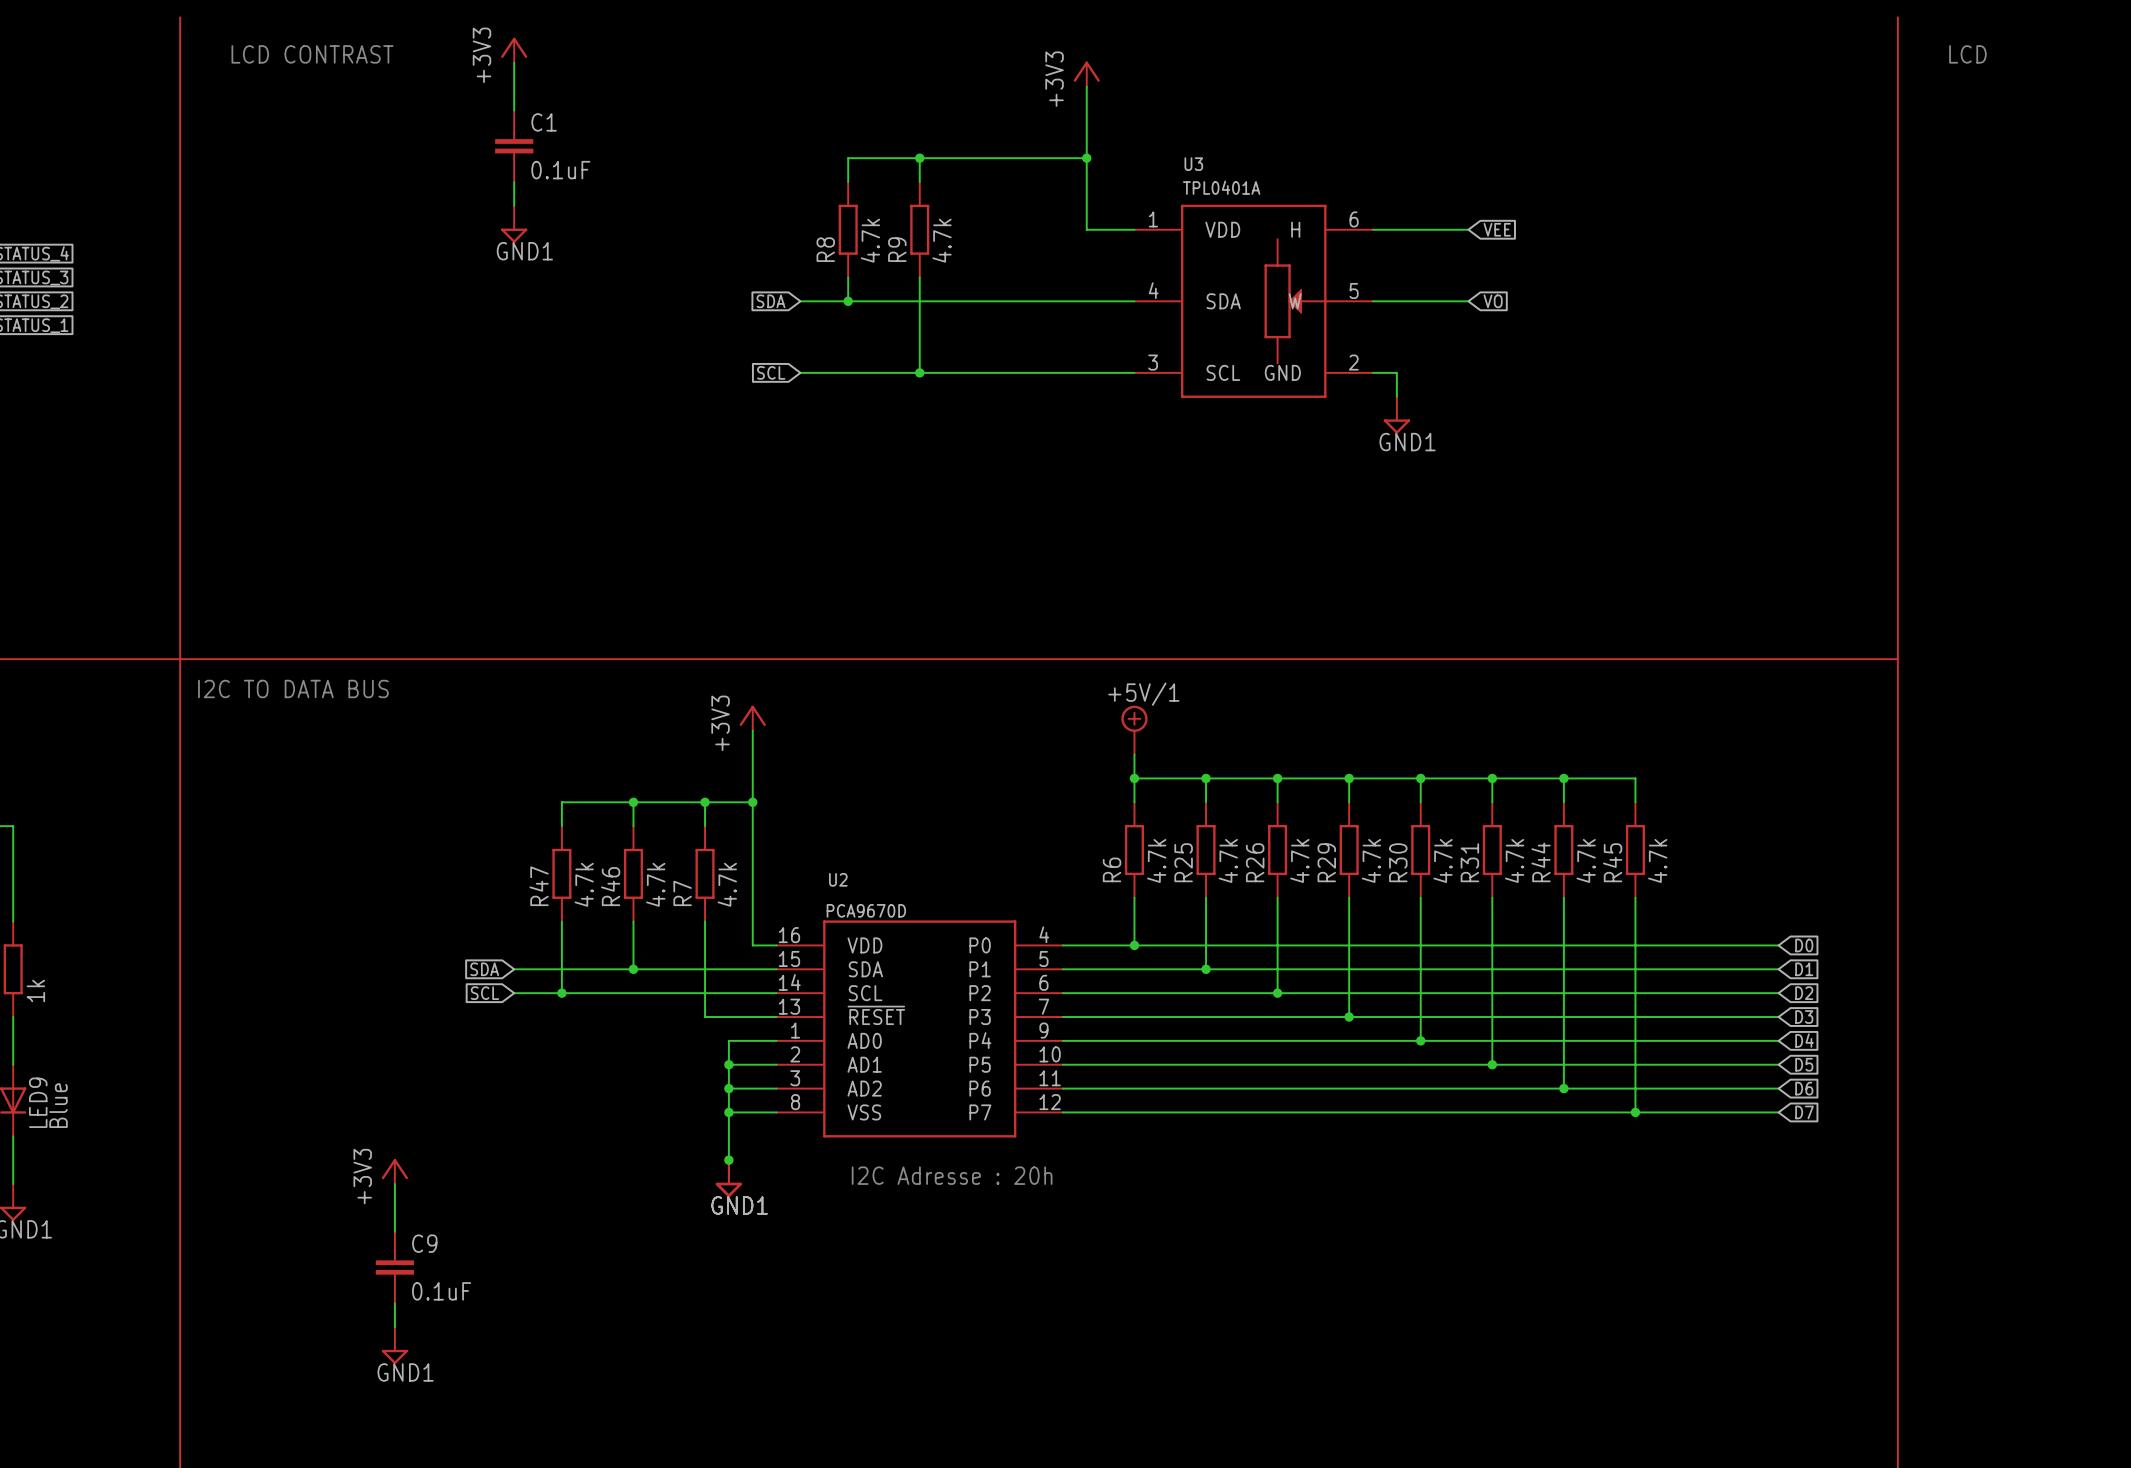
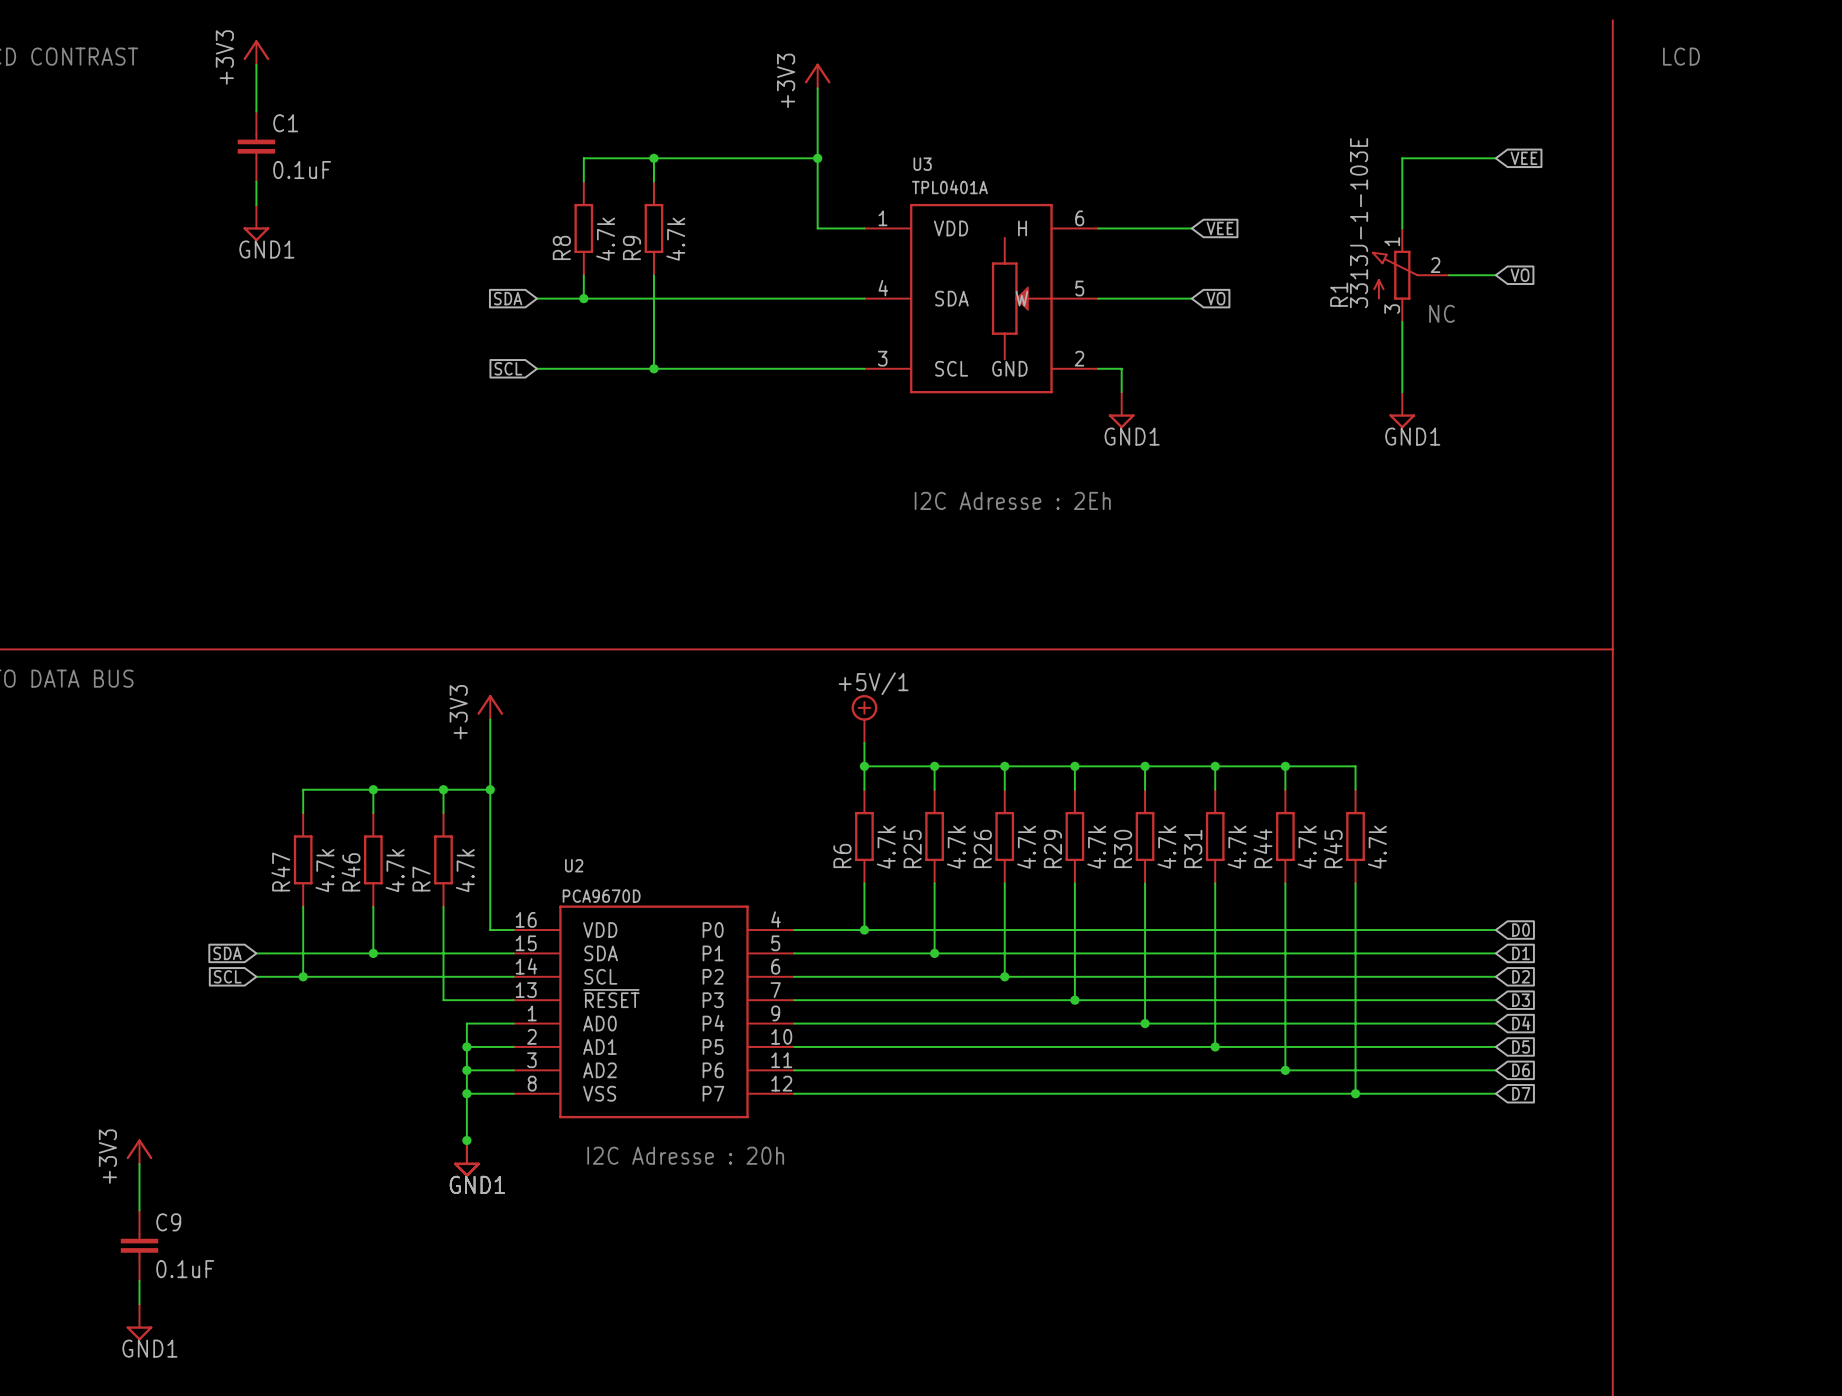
wire: none -> (1495, 158) (1402, 158) (1402, 228)
global label: none -> VEE (1524, 158)
R1: none -> 3313J-1-103E (1410, 275)
wire: none -> (1449, 275) (1495, 275)
global label: none -> VO (1520, 275)
text: none -> NC (1441, 313)
wire: none -> (1402, 322) (1402, 392)
power symbol: none -> GND1 (1402, 410)
text: none -> I2C Adresse : 2Eh (1012, 500)

